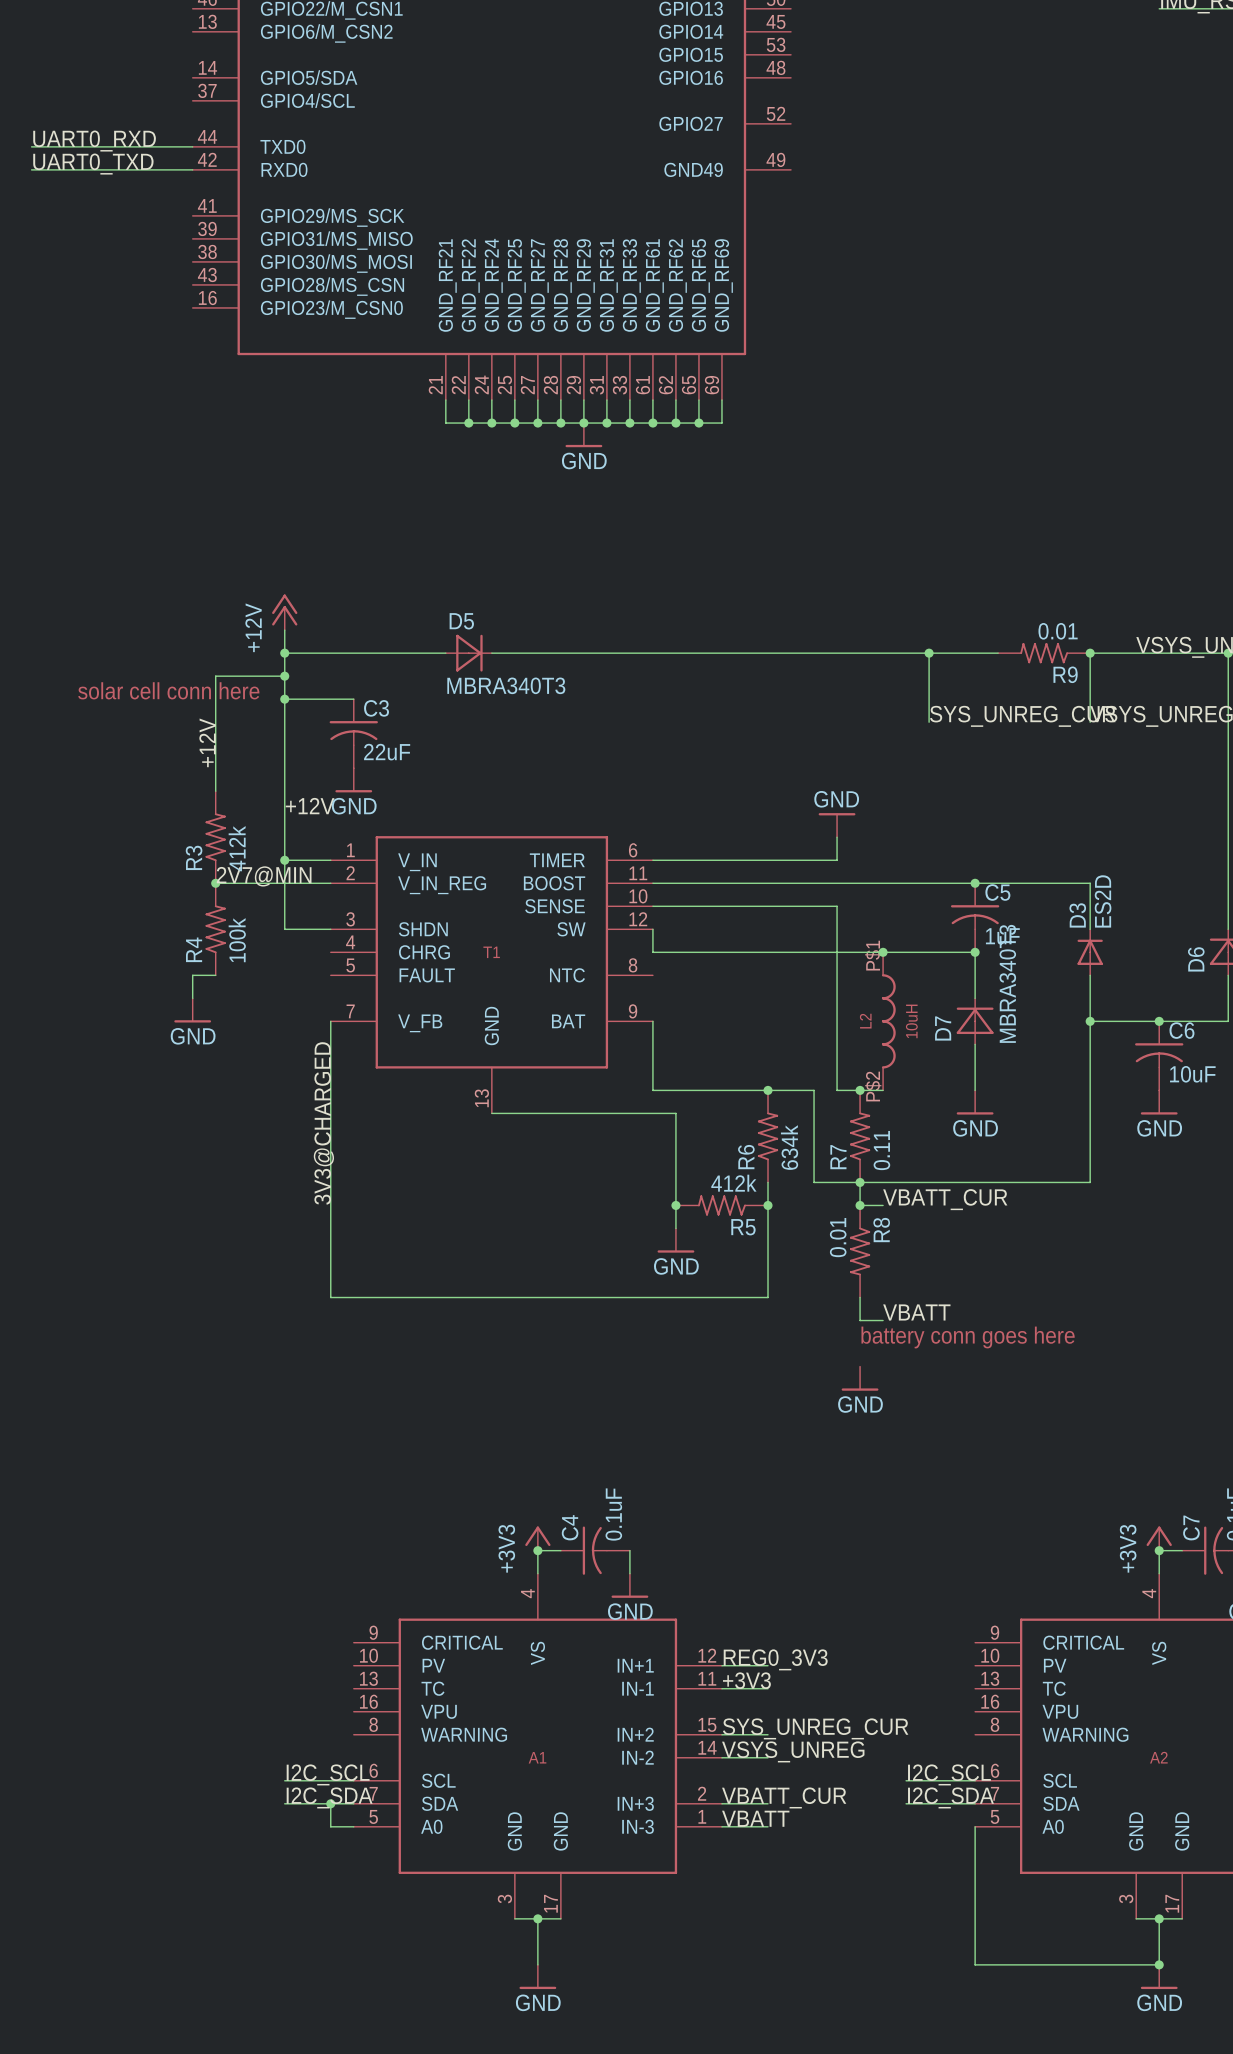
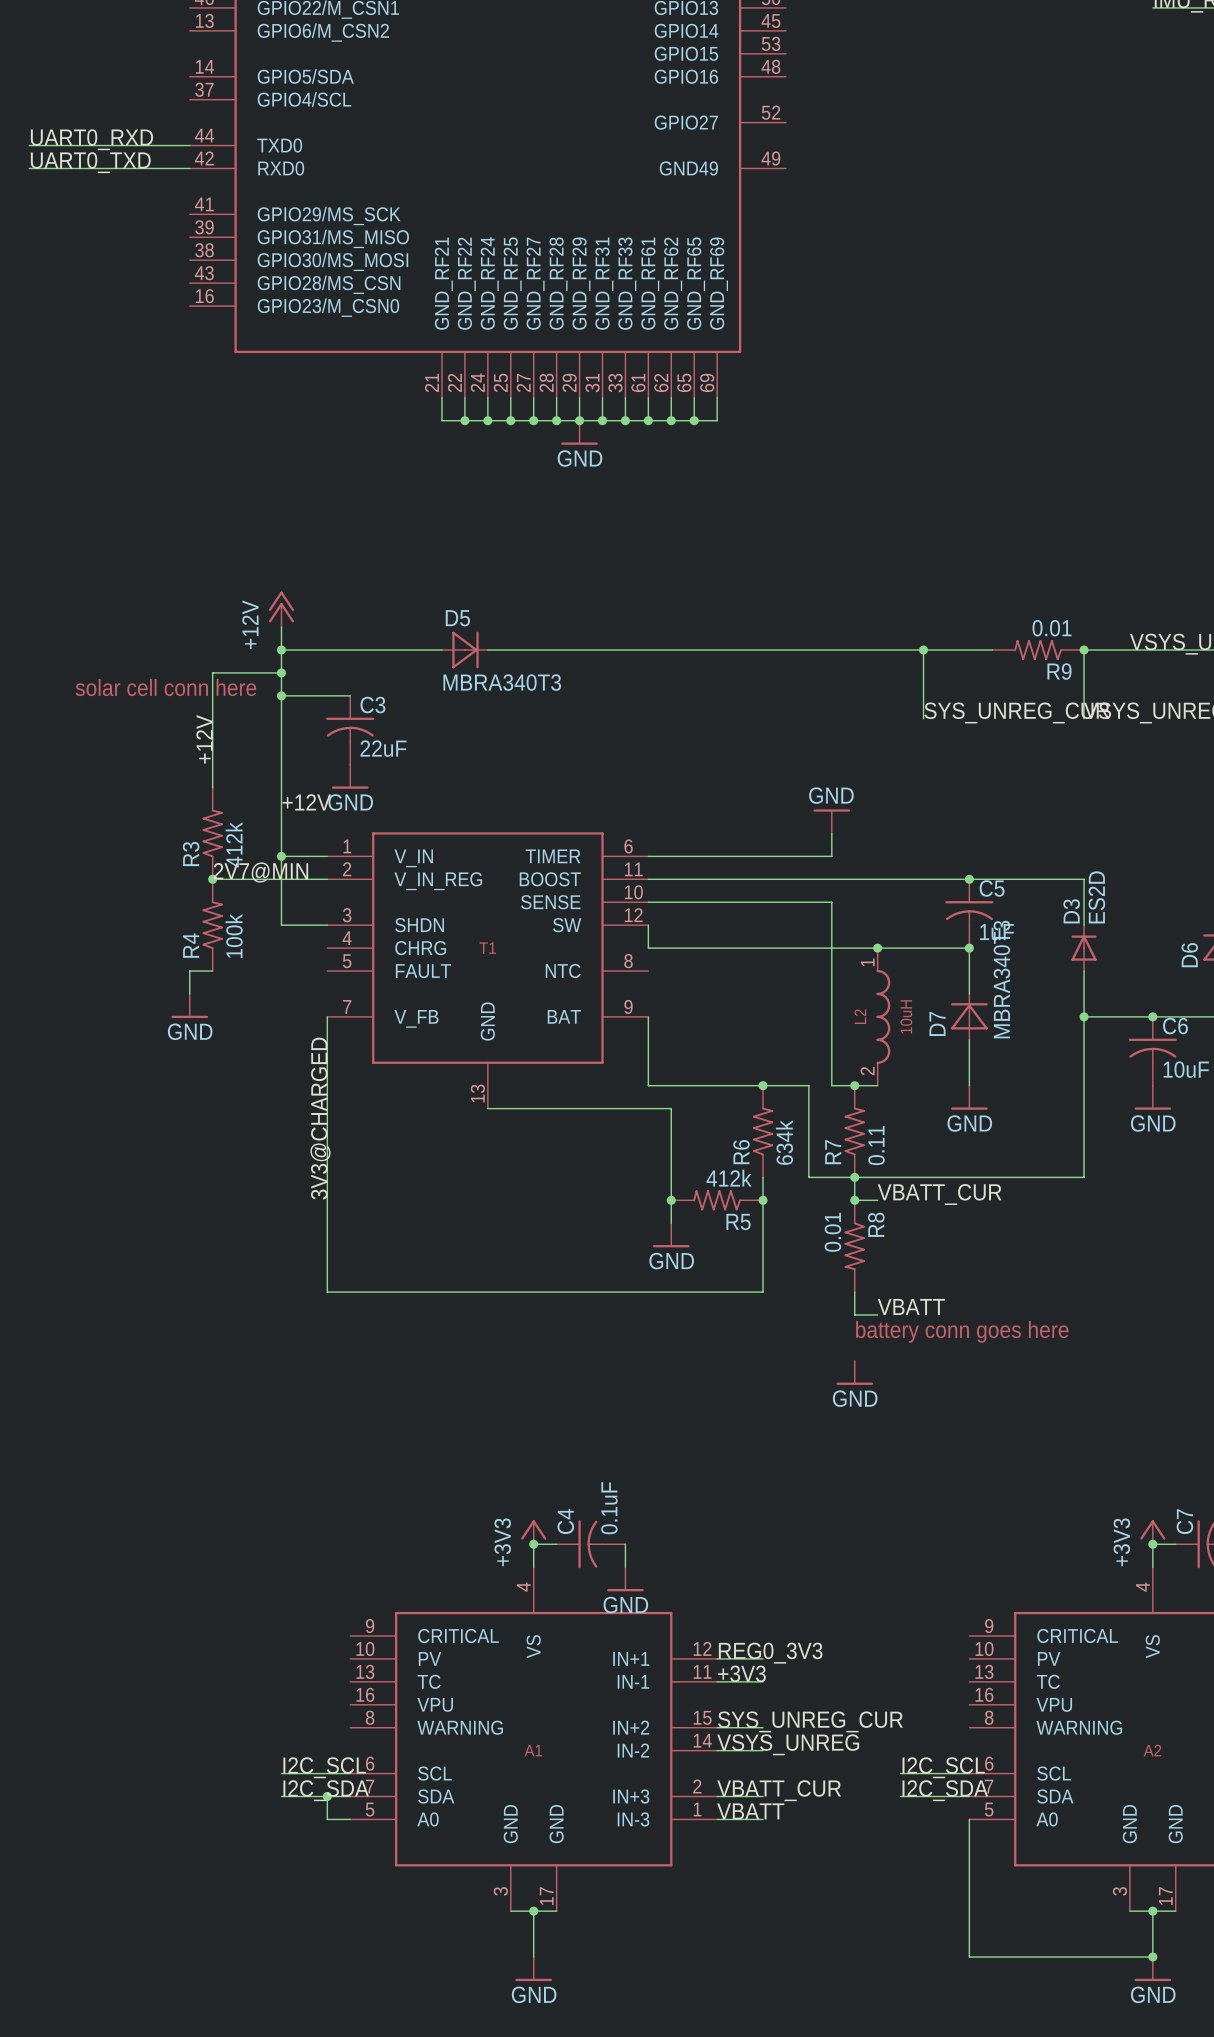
L2 pin number: P$1 (873, 955) -> 1 (867, 962)
L2 pin number: P$2 (873, 1086) -> 2 (867, 1071)

